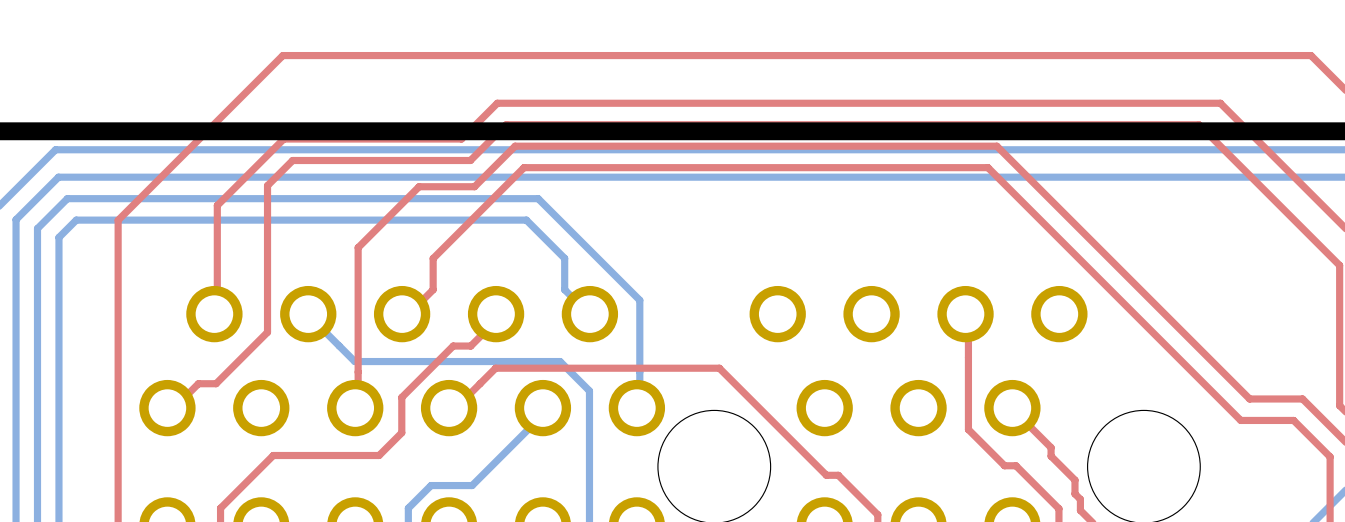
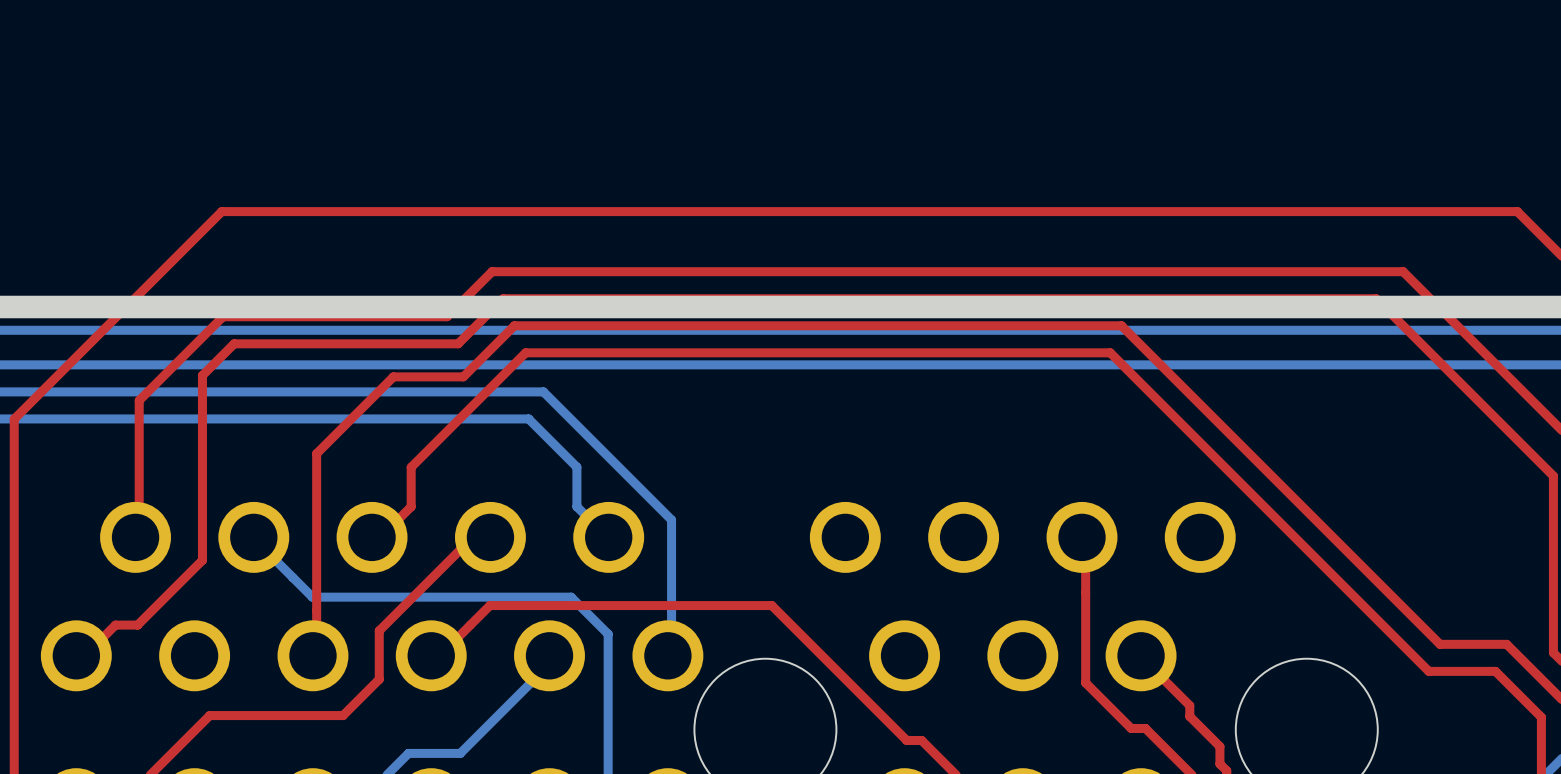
top track: (498, 317) (470, 346) (453, 346) (401, 397) (401, 432) -> (494, 542) (467, 542) (379, 630) (379, 679) (371, 686)

